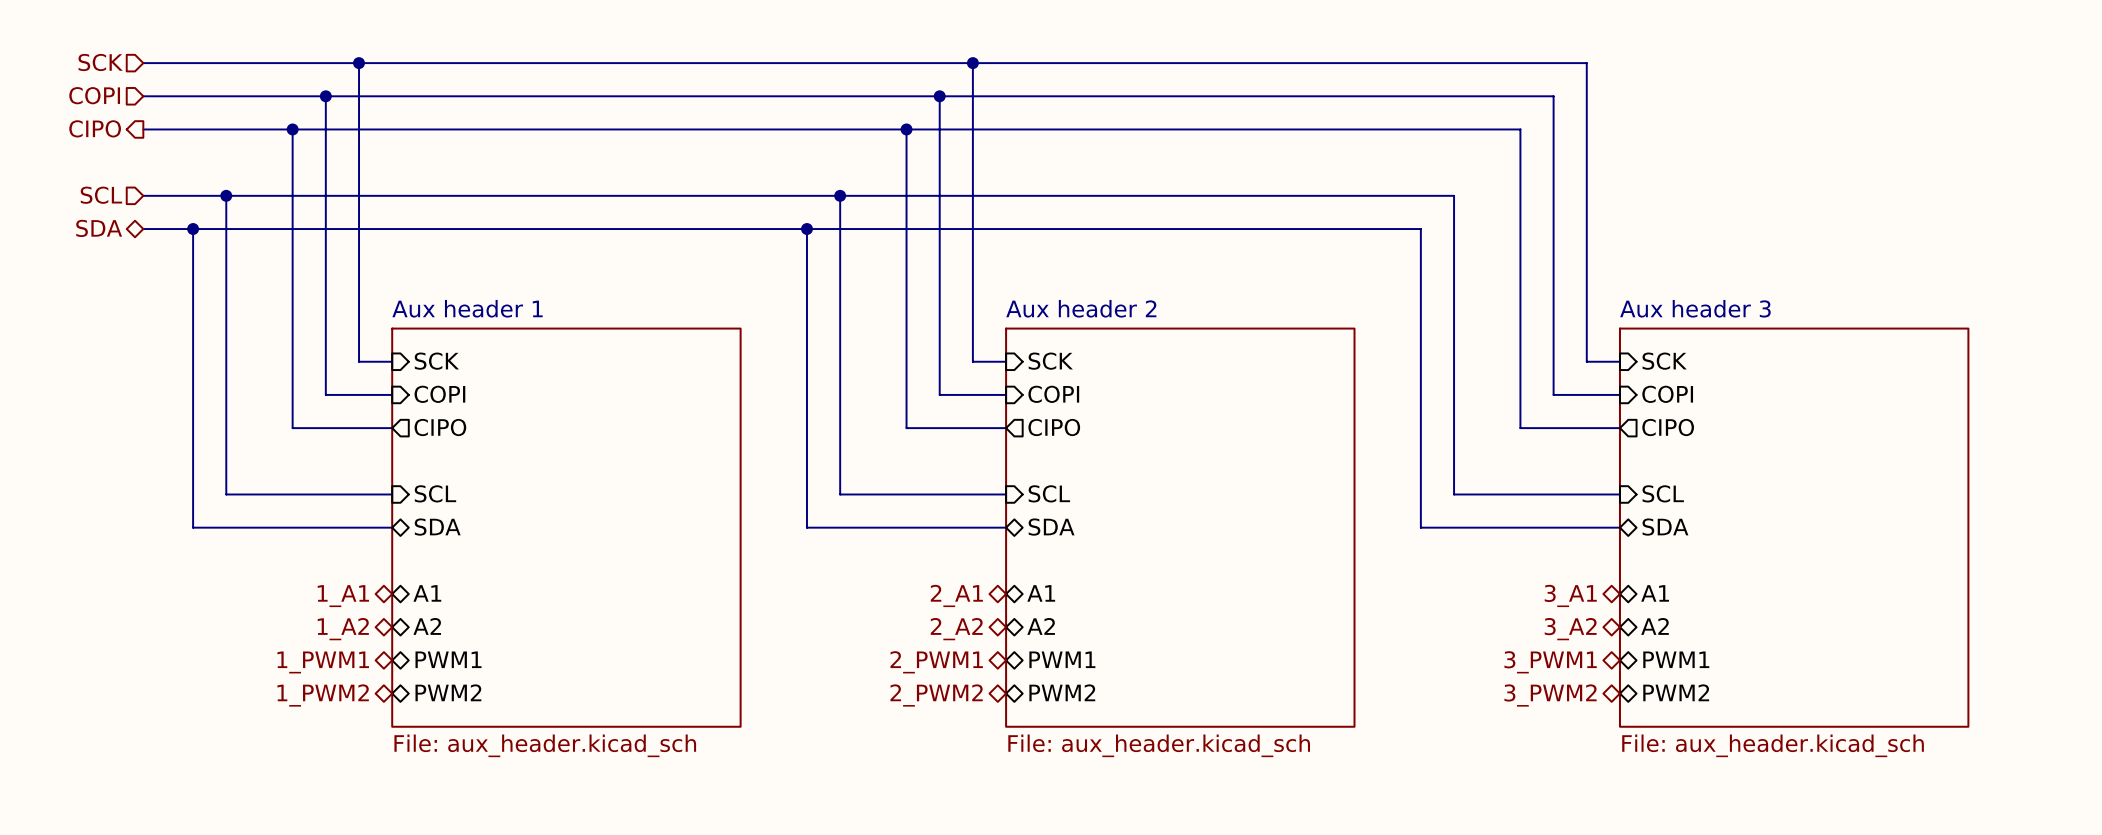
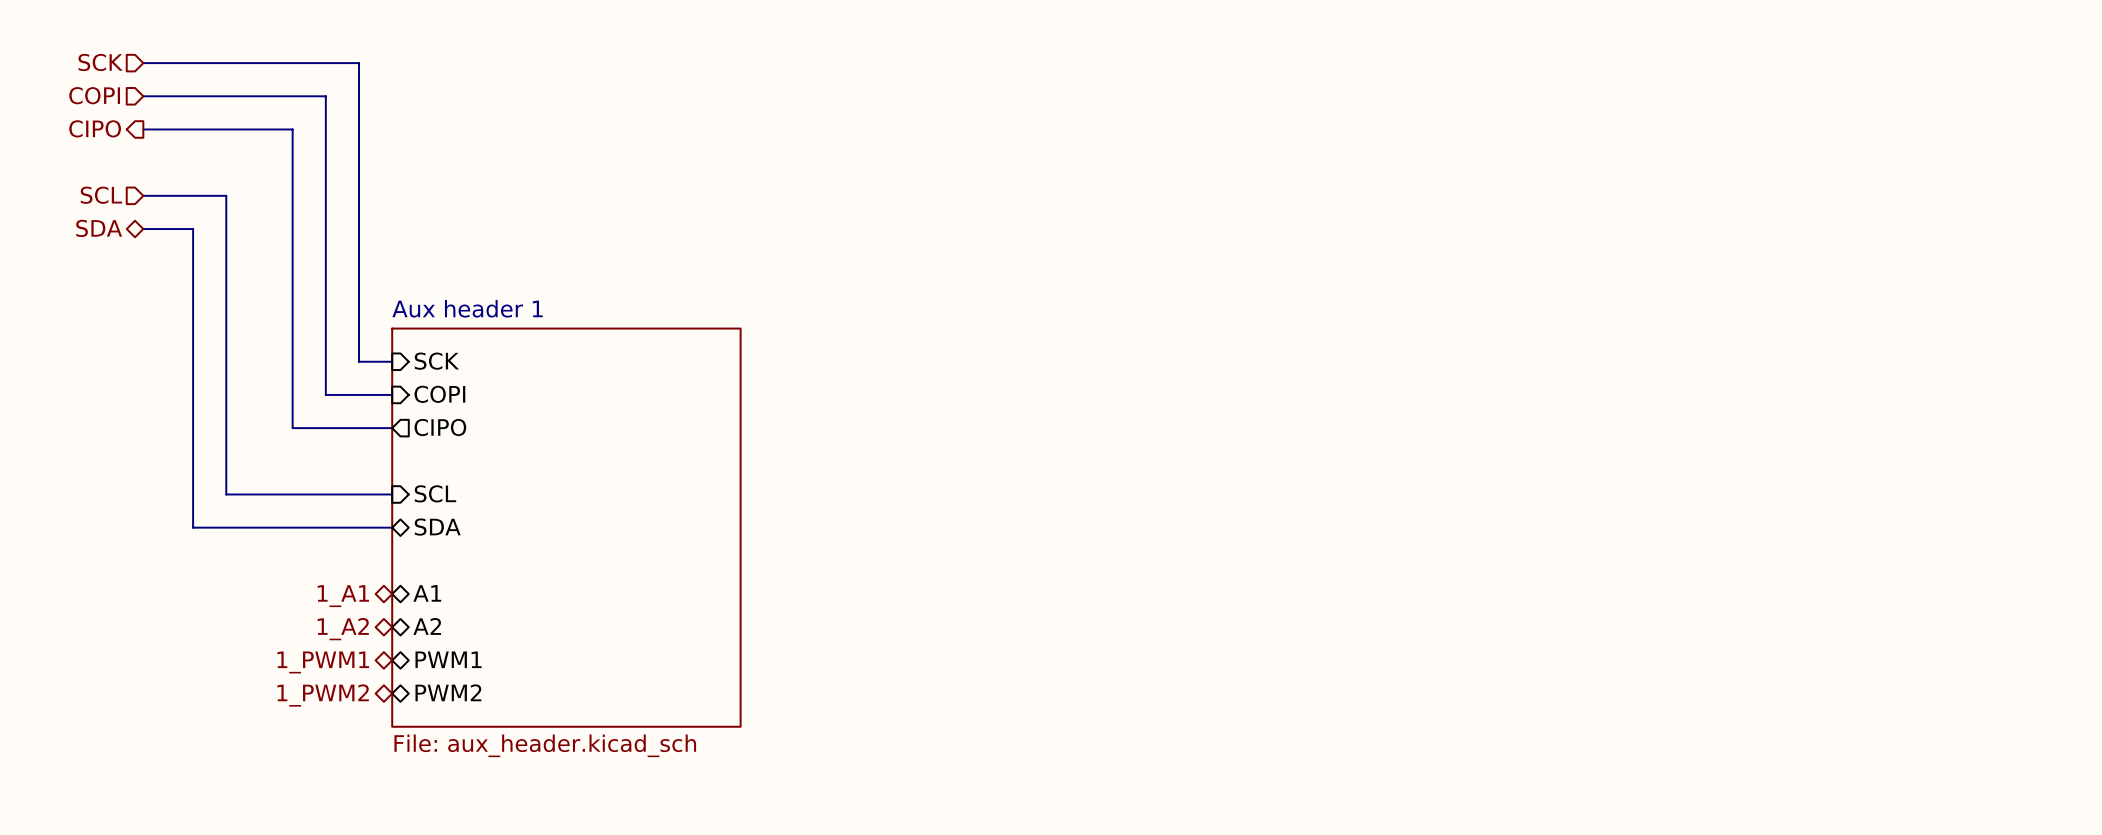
wire: (359, 63) (1586, 63) (1586, 361) (1619, 361) -> none
junction: (359, 63) -> none
wire: (972, 63) (972, 361) (1006, 361) -> none
junction: (972, 63) -> none
wire: (325, 96) (1553, 96) (1553, 394) (1619, 394) -> none
junction: (325, 96) -> none
wire: (939, 96) (939, 394) (1006, 394) -> none
junction: (939, 96) -> none
wire: (292, 129) (1520, 129) (1520, 428) (1619, 428) -> none
junction: (292, 129) -> none
wire: (906, 129) (906, 428) (1006, 428) -> none
junction: (906, 129) -> none
wire: (226, 195) (1454, 195) (1454, 494) (1619, 494) -> none
junction: (226, 195) -> none
wire: (840, 195) (840, 494) (1006, 494) -> none
junction: (840, 195) -> none
wire: (193, 229) (1420, 229) (1420, 527) (1619, 527) -> none
junction: (193, 229) -> none
wire: (806, 229) (806, 527) (1006, 527) -> none
junction: (806, 229) -> none
sheet pin: SCK (1050, 361) -> none
sheet pin: SCK (1664, 361) -> none
sheet pin: COPI (1053, 394) -> none
sheet pin: COPI (1667, 394) -> none
sheet pin: CIPO (1054, 427) -> none
sheet pin: CIPO (1668, 427) -> none
sheet pin: SCL (1049, 493) -> none
sheet pin: SCL (1663, 493) -> none
sheet pin: SDA (1051, 527) -> none
sheet Aux header 2: File: aux_header.kicad_sch (1180, 527) -> none
sheet pin: SDA (1665, 527) -> none
sheet Aux header 3: File: aux_header.kicad_sch (1794, 527) -> none
sheet pin: A1 (1041, 593) -> none
sheet pin: A1 (1655, 593) -> none
hierarchical label: 2_A1 (956, 595) -> none
hierarchical label: 3_A1 (1570, 595) -> none
sheet pin: A2 (1041, 626) -> none
sheet pin: A2 (1655, 626) -> none
hierarchical label: 2_A2 (956, 629) -> none
hierarchical label: 3_A2 (1570, 629) -> none
sheet pin: PWM1 (1062, 659) -> none
sheet pin: PWM1 (1676, 659) -> none
hierarchical label: 2_PWM1 (936, 662) -> none
hierarchical label: 3_PWM1 (1550, 662) -> none
sheet pin: PWM2 (1062, 692) -> none
sheet pin: PWM2 (1676, 692) -> none
hierarchical label: 2_PWM2 (936, 695) -> none
hierarchical label: 3_PWM2 (1550, 695) -> none

